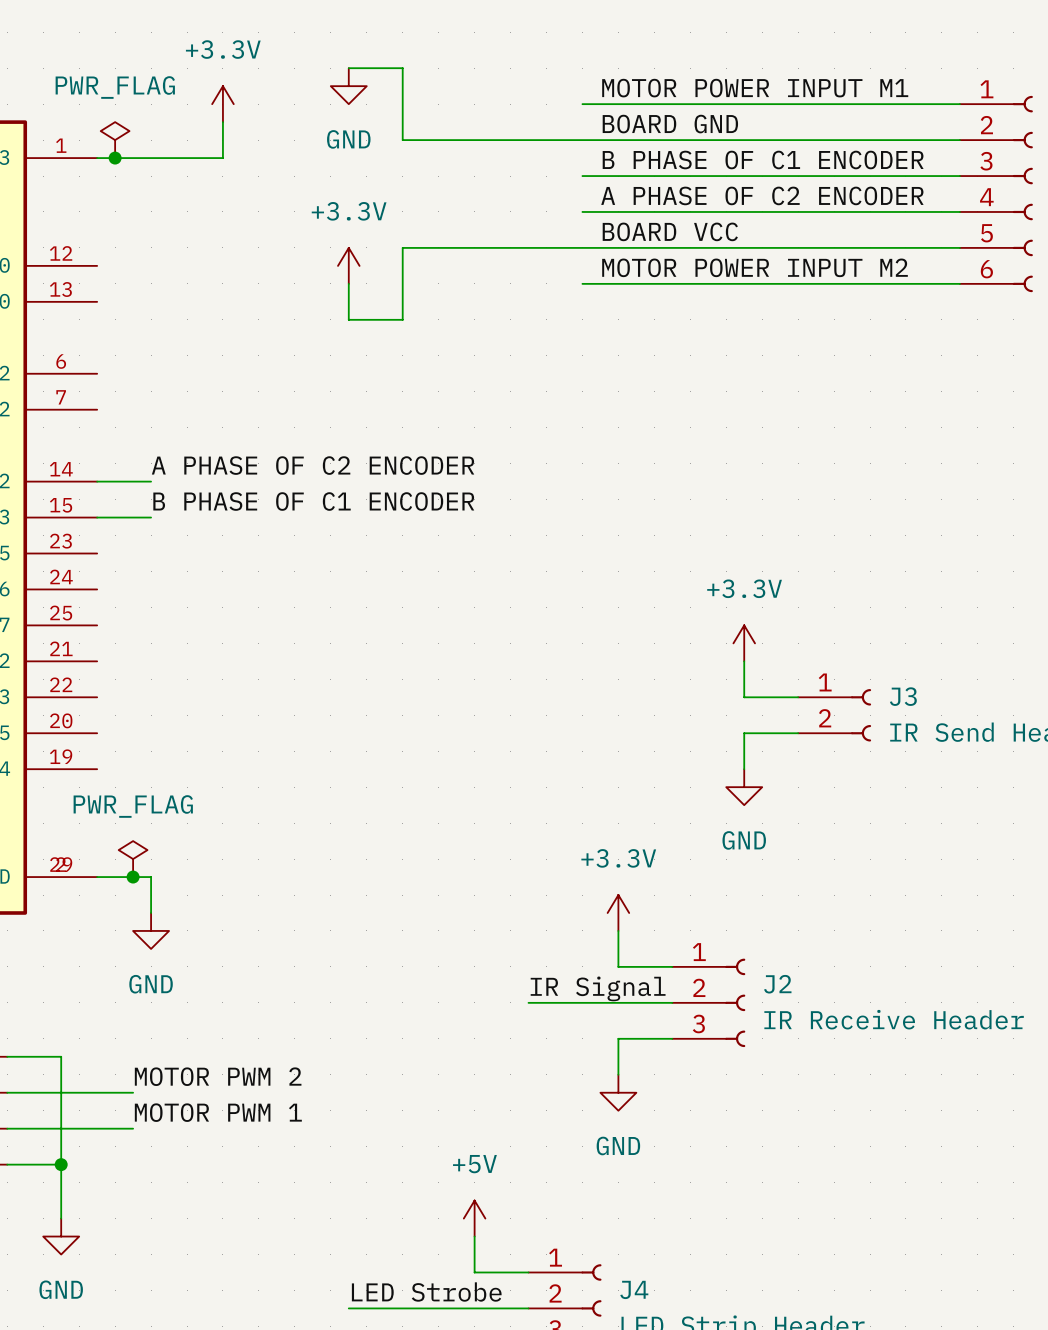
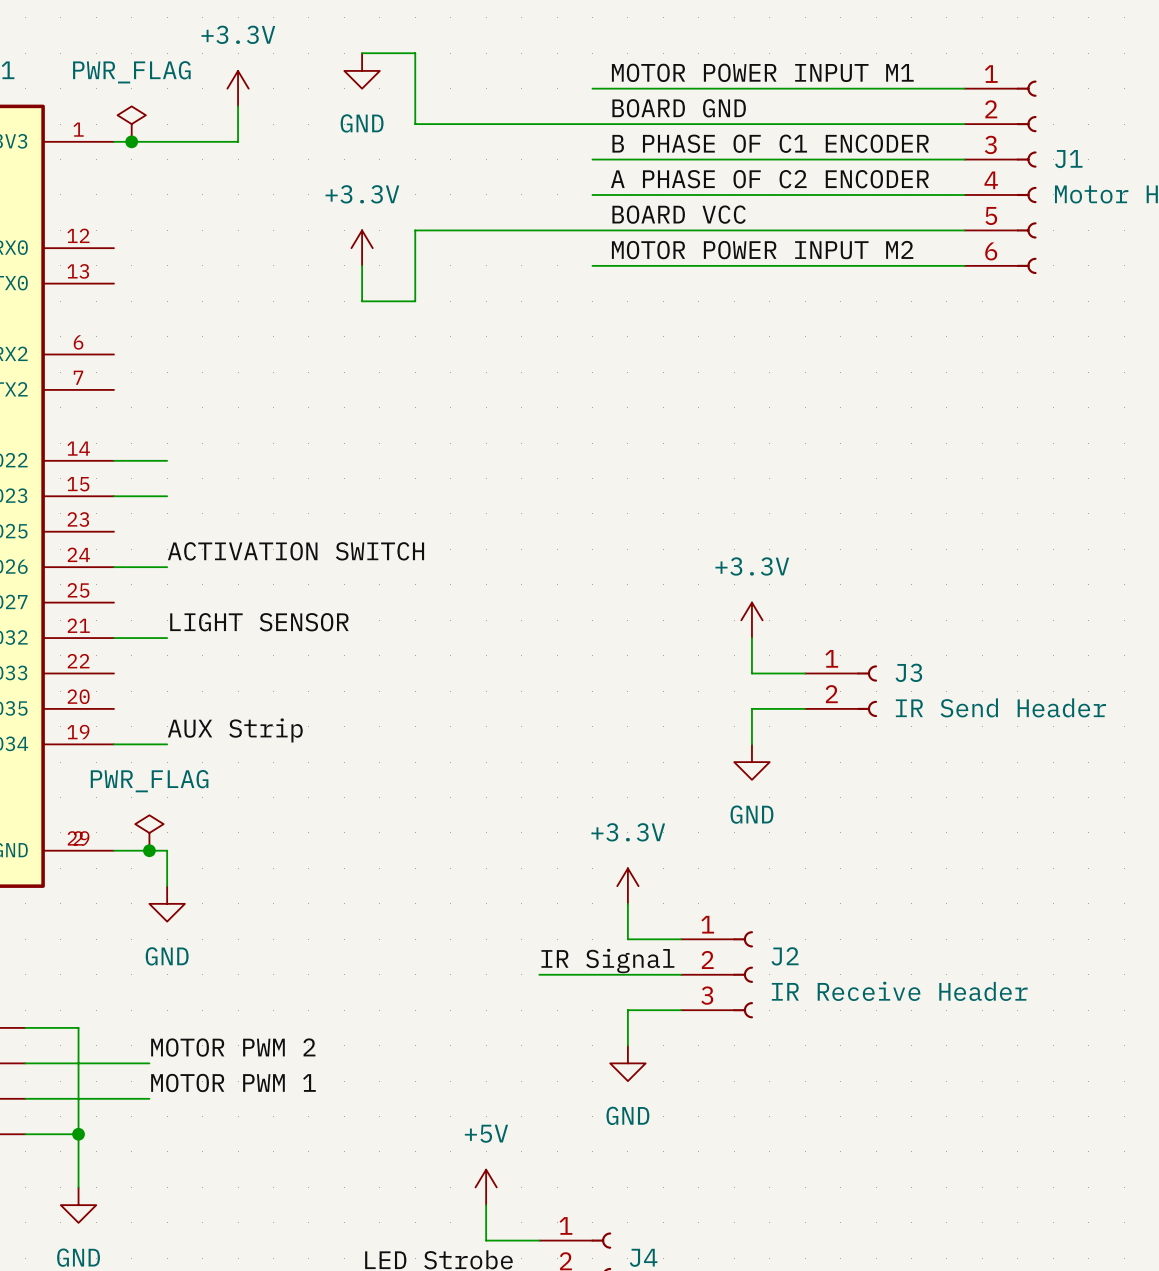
label: A PHASE OF C2 ENCODER (313, 465) -> none
label: B PHASE OF C1 ENCODER (313, 501) -> none
label: none -> ACTIVATION SWITCH (296, 551)
wire: none -> (113, 567) (167, 567)
label: none -> LIGHT SENSOR (259, 622)
wire: none -> (113, 638) (167, 638)
label: none -> AUX Strip (235, 730)
wire: none -> (113, 744) (167, 744)

